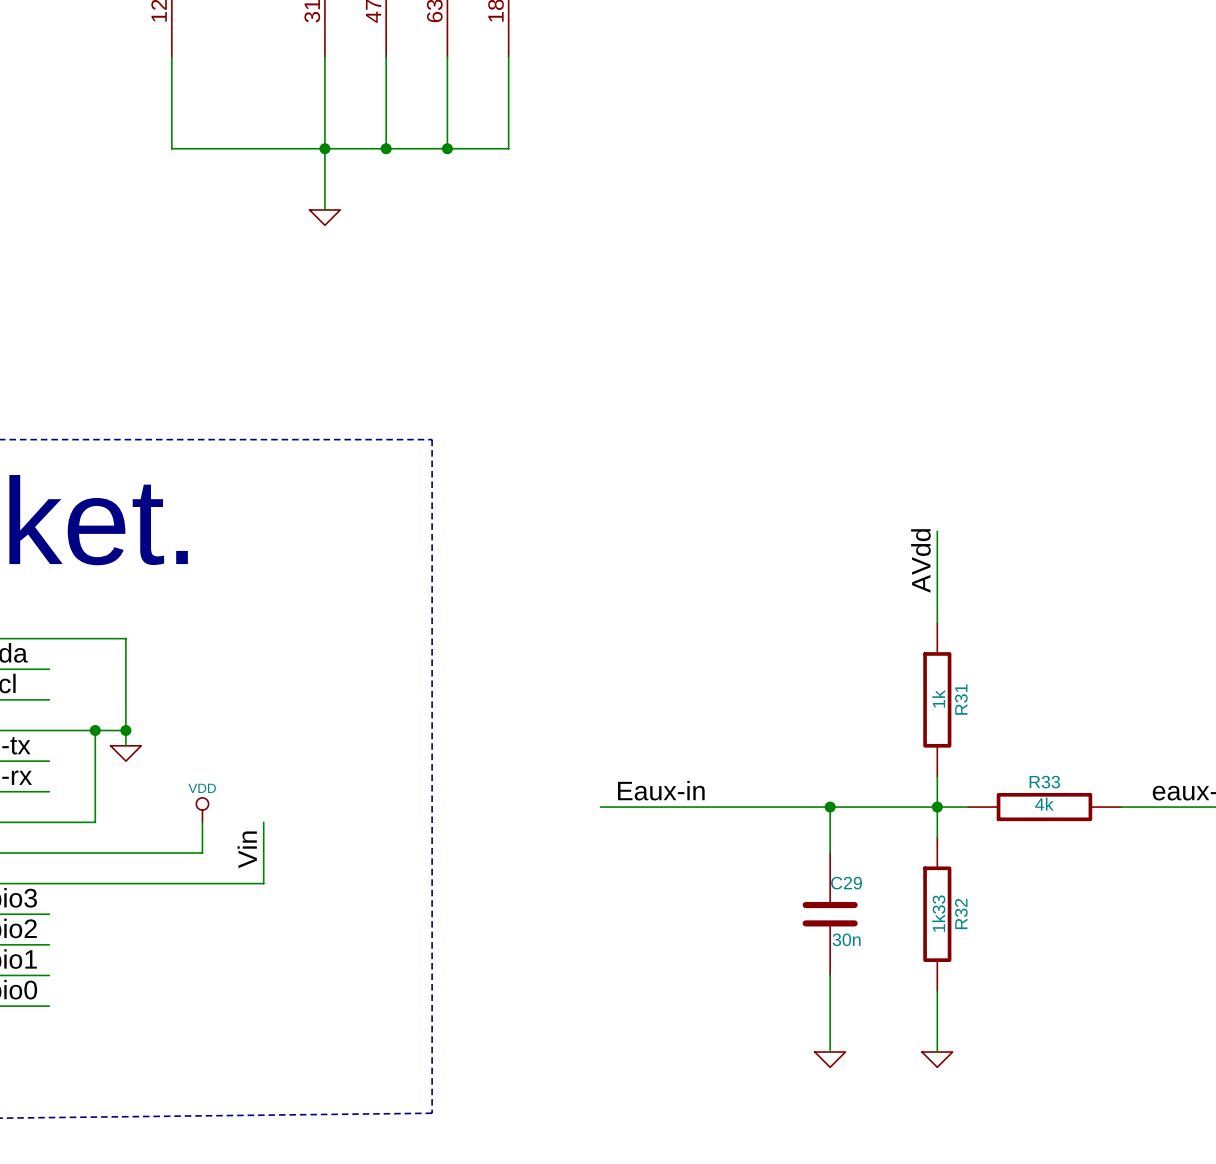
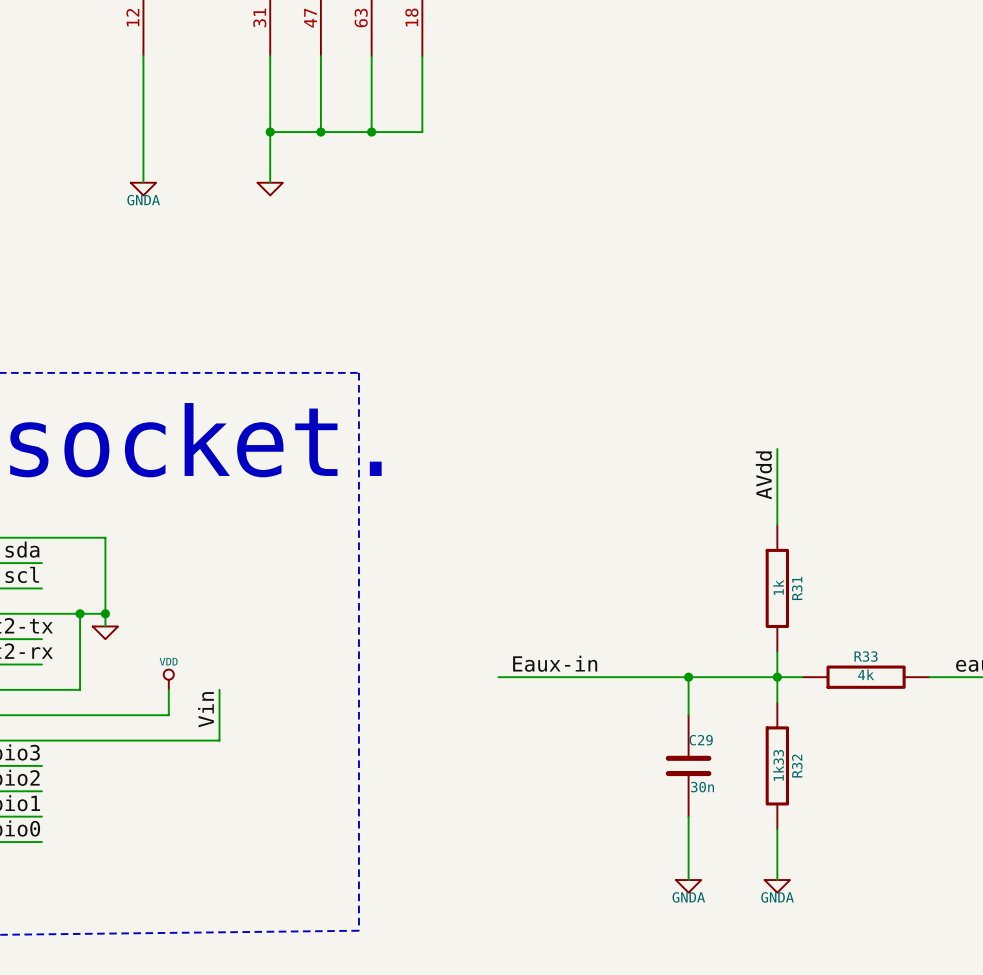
wire: (171, 148) (324, 148) -> (143, 132) (143, 182)
power symbol: none -> GNDA (143, 189)
power symbol text: none -> GNDA (688, 897)
power symbol text: none -> GNDA (777, 897)

